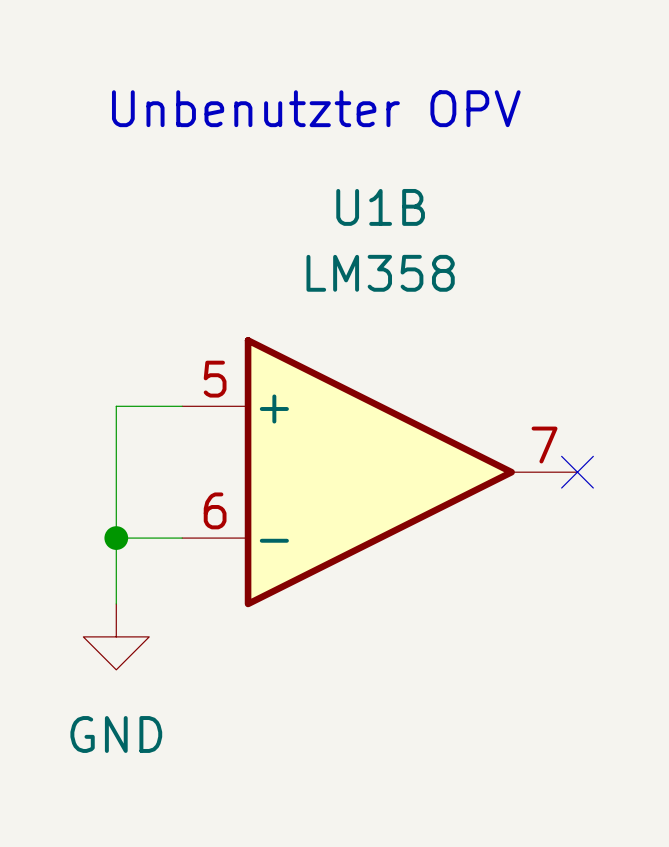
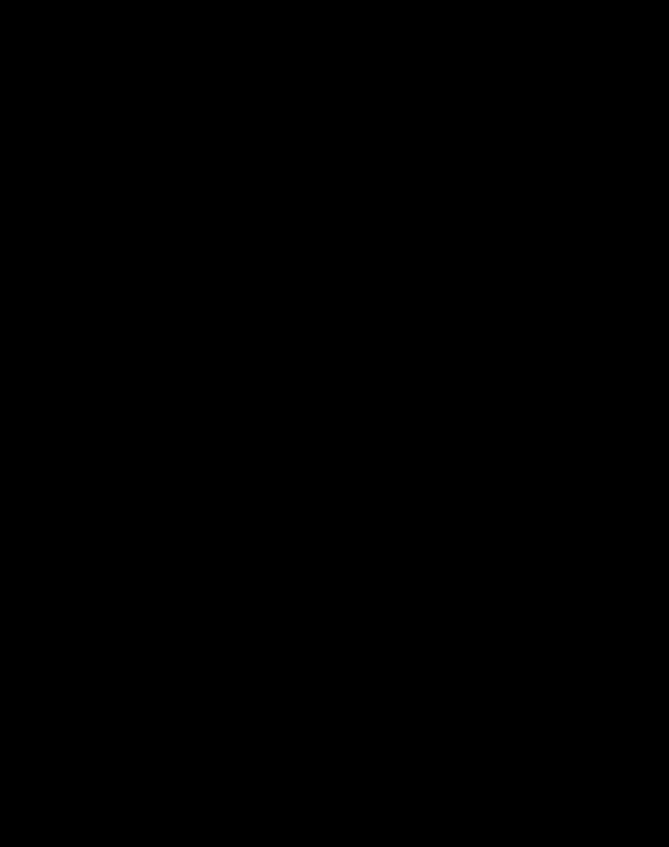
text: Unbenutzter OPV (316, 108) -> none
wire: (182, 406) (116, 406) (116, 603) -> none
U1B: LM358 (379, 472) -> none
no-connect mark: (577, 472) -> none
wire: (116, 538) (182, 538) -> none
junction: (116, 538) -> none
power symbol: GND (116, 636) -> none

